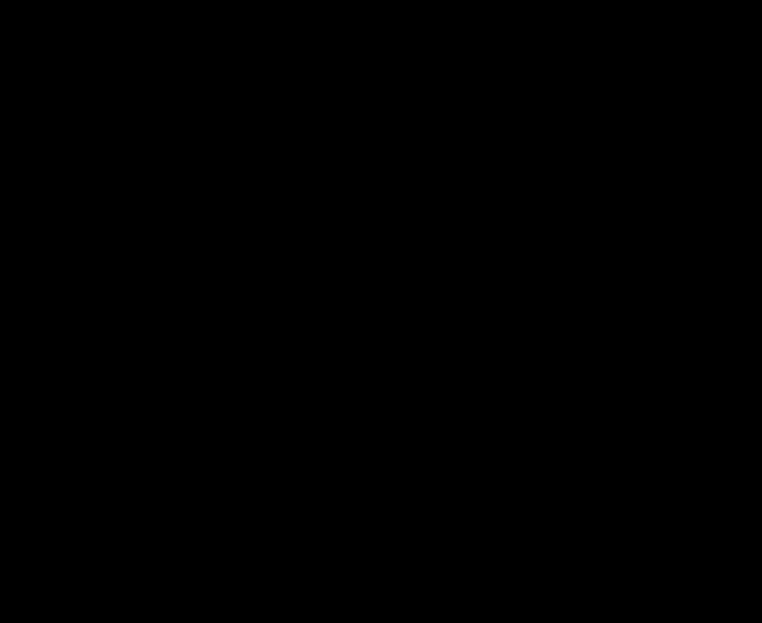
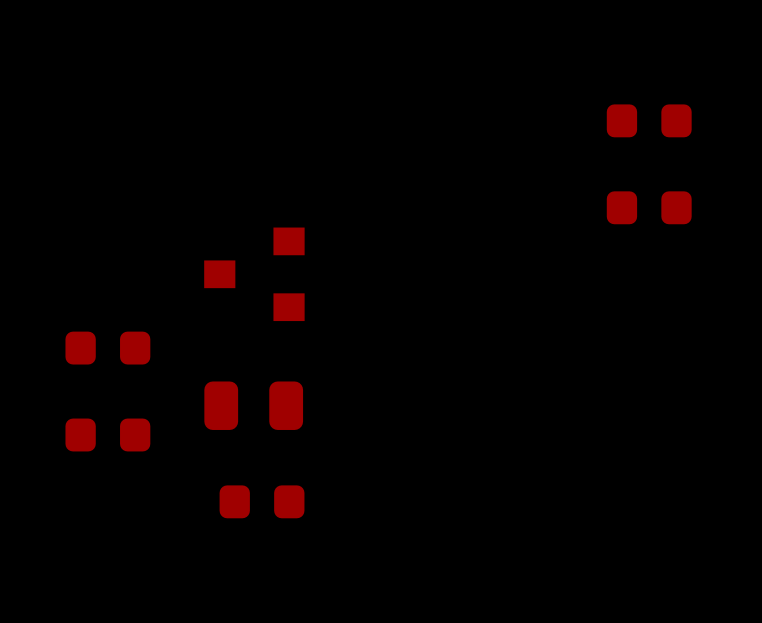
part: none -> (649, 120)
part: none -> (649, 207)
part: none -> (254, 274)
part: none -> (107, 348)
part: none -> (253, 405)
part: none -> (107, 434)
part: none -> (262, 501)

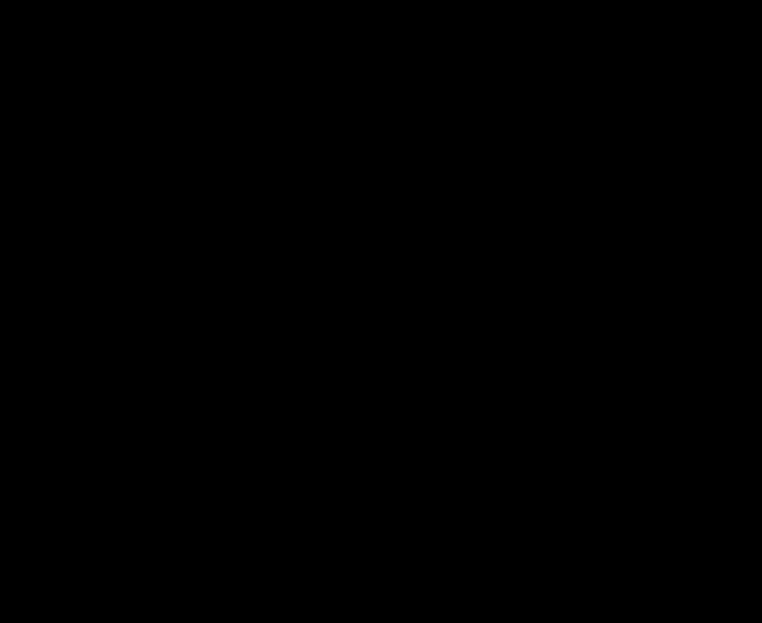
part: (649, 120) -> none
part: (649, 207) -> none
part: (254, 274) -> none
part: (107, 348) -> none
part: (253, 405) -> none
part: (107, 434) -> none
part: (262, 501) -> none

